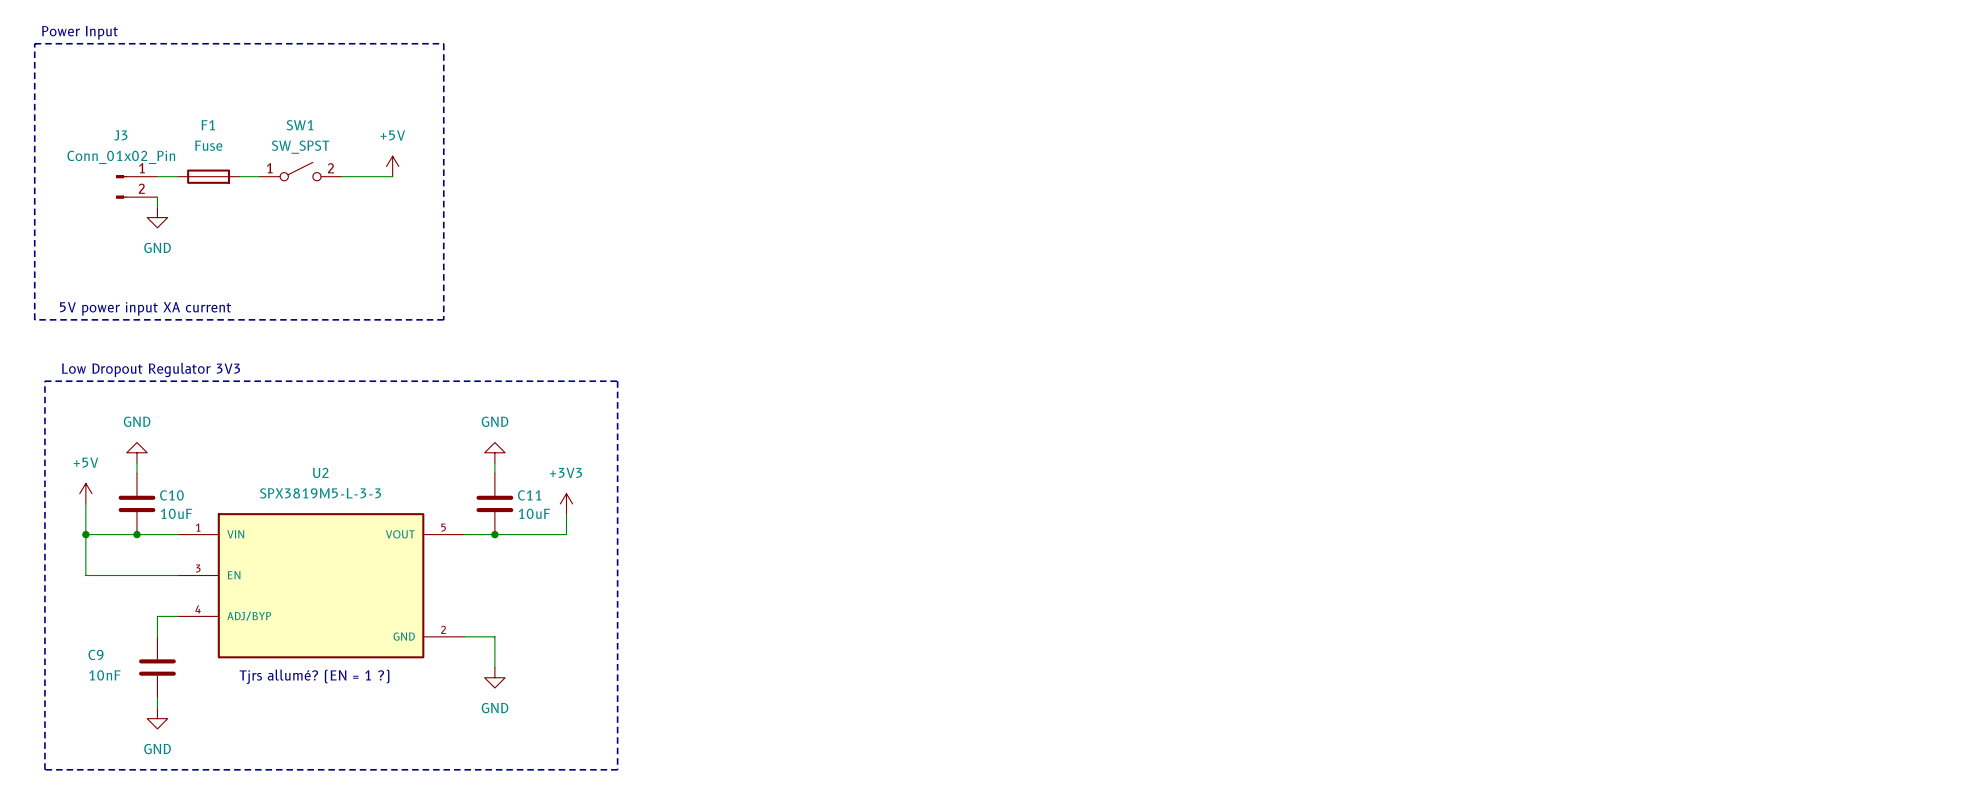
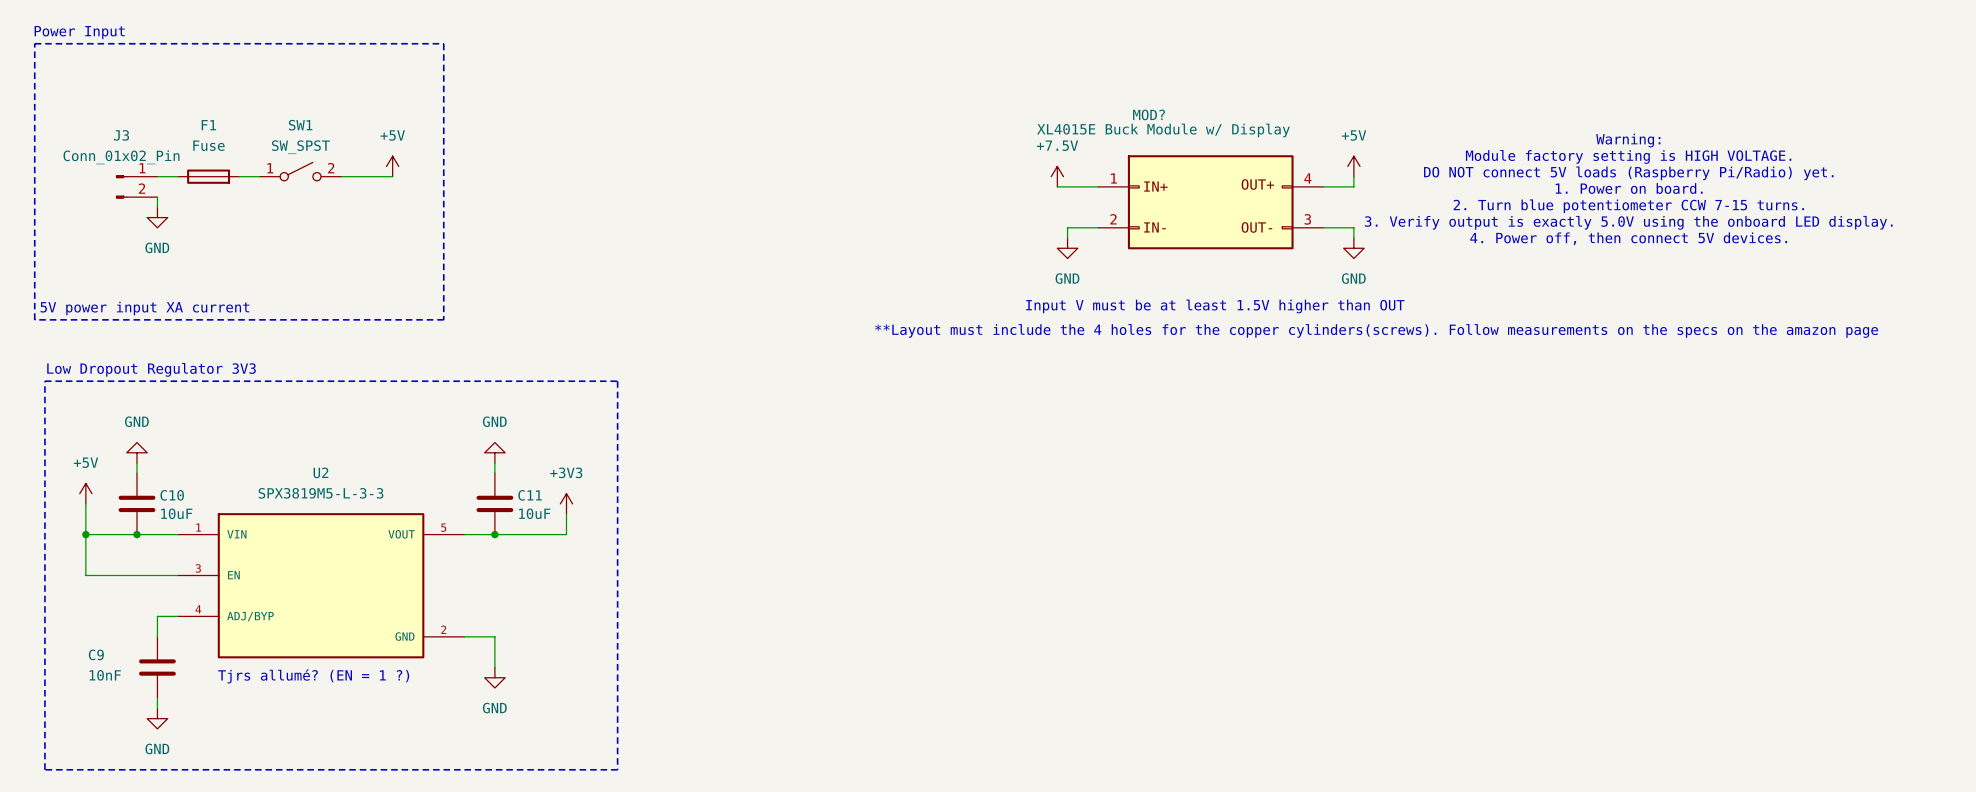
text: none -> Warning: (1628, 140)
text: none -> Module factory setting is HIGH VOLTAGE. (1628, 156)
power symbol: none -> +5V (1353, 166)
text: none -> DO NOT connect 5V loads (Raspberry Pi/Radio) yet. (1628, 173)
power symbol: none -> +7.5V (1057, 176)
wire: none -> (1353, 176) (1353, 186) (1323, 186)
wire: none -> (1057, 186) (1098, 186)
text: none -> 1. Power on board. (1629, 188)
MOD?: none -> XL4015E Buck Module w/ Display (1210, 202)
text: none -> 2. Turn blue potentiometer CCW 7-15 turns. (1628, 206)
text: none -> 3. Verify output is exactly 5.0V using the onboard LED display. (1628, 222)
wire: none -> (1098, 227) (1067, 227) (1067, 238)
wire: none -> (1323, 227) (1353, 227) (1353, 238)
text: none -> 4. Power off, then connect 5V devices. (1628, 238)
power symbol: none -> GND (1067, 248)
power symbol: none -> GND (1353, 248)
text: none -> Input V must be at least 1.5V higher than OUT (1215, 306)
text: none -> **Layout must include the 4 holes for the copper cylinders(screws). Follow measurements on the specs on the amazon page (1376, 330)

